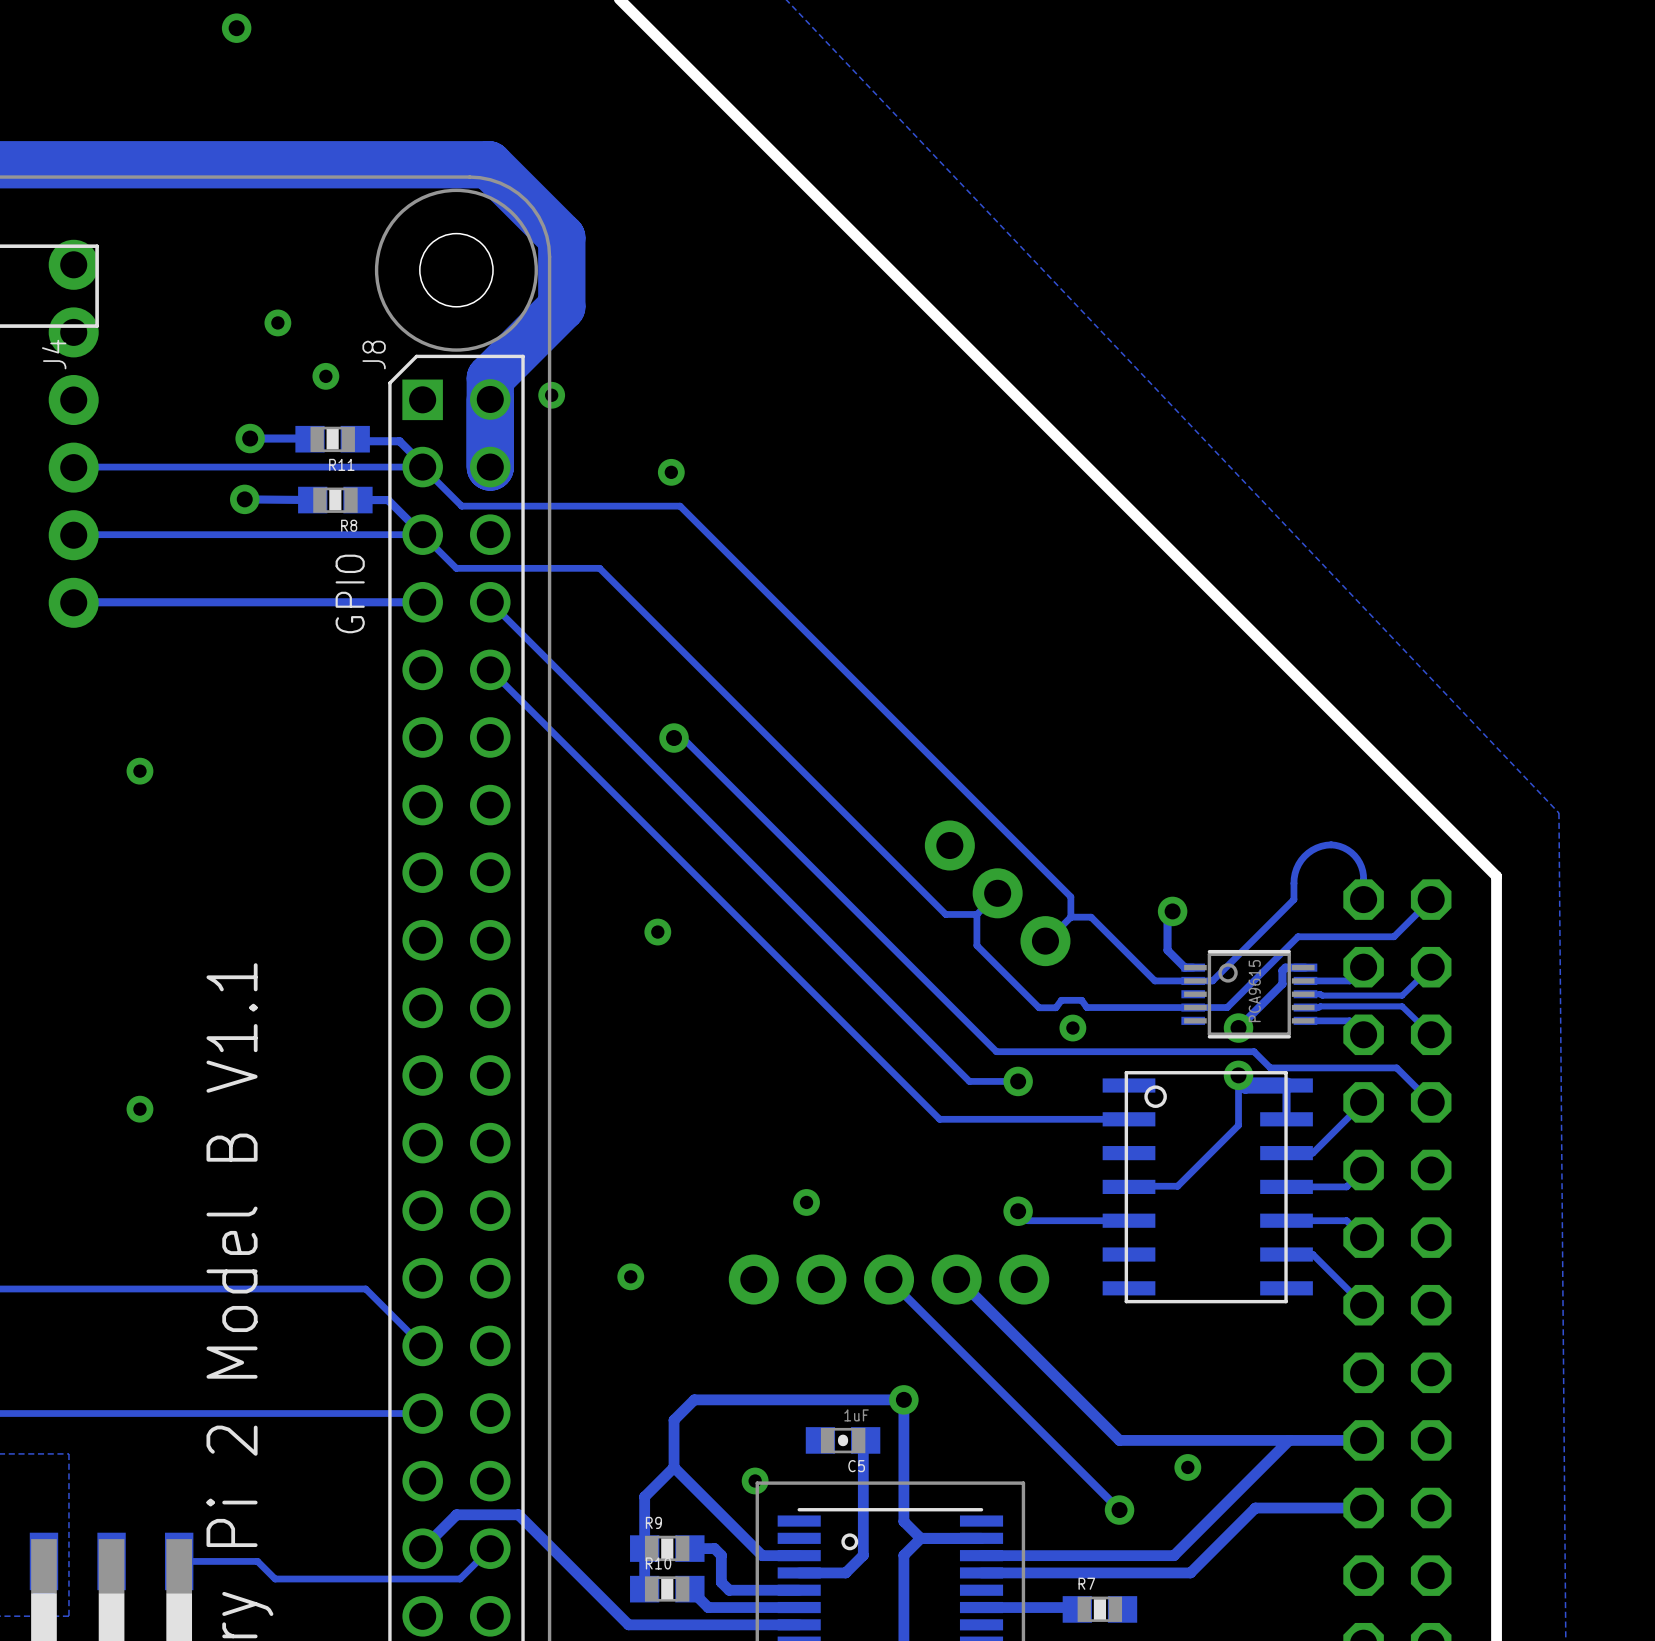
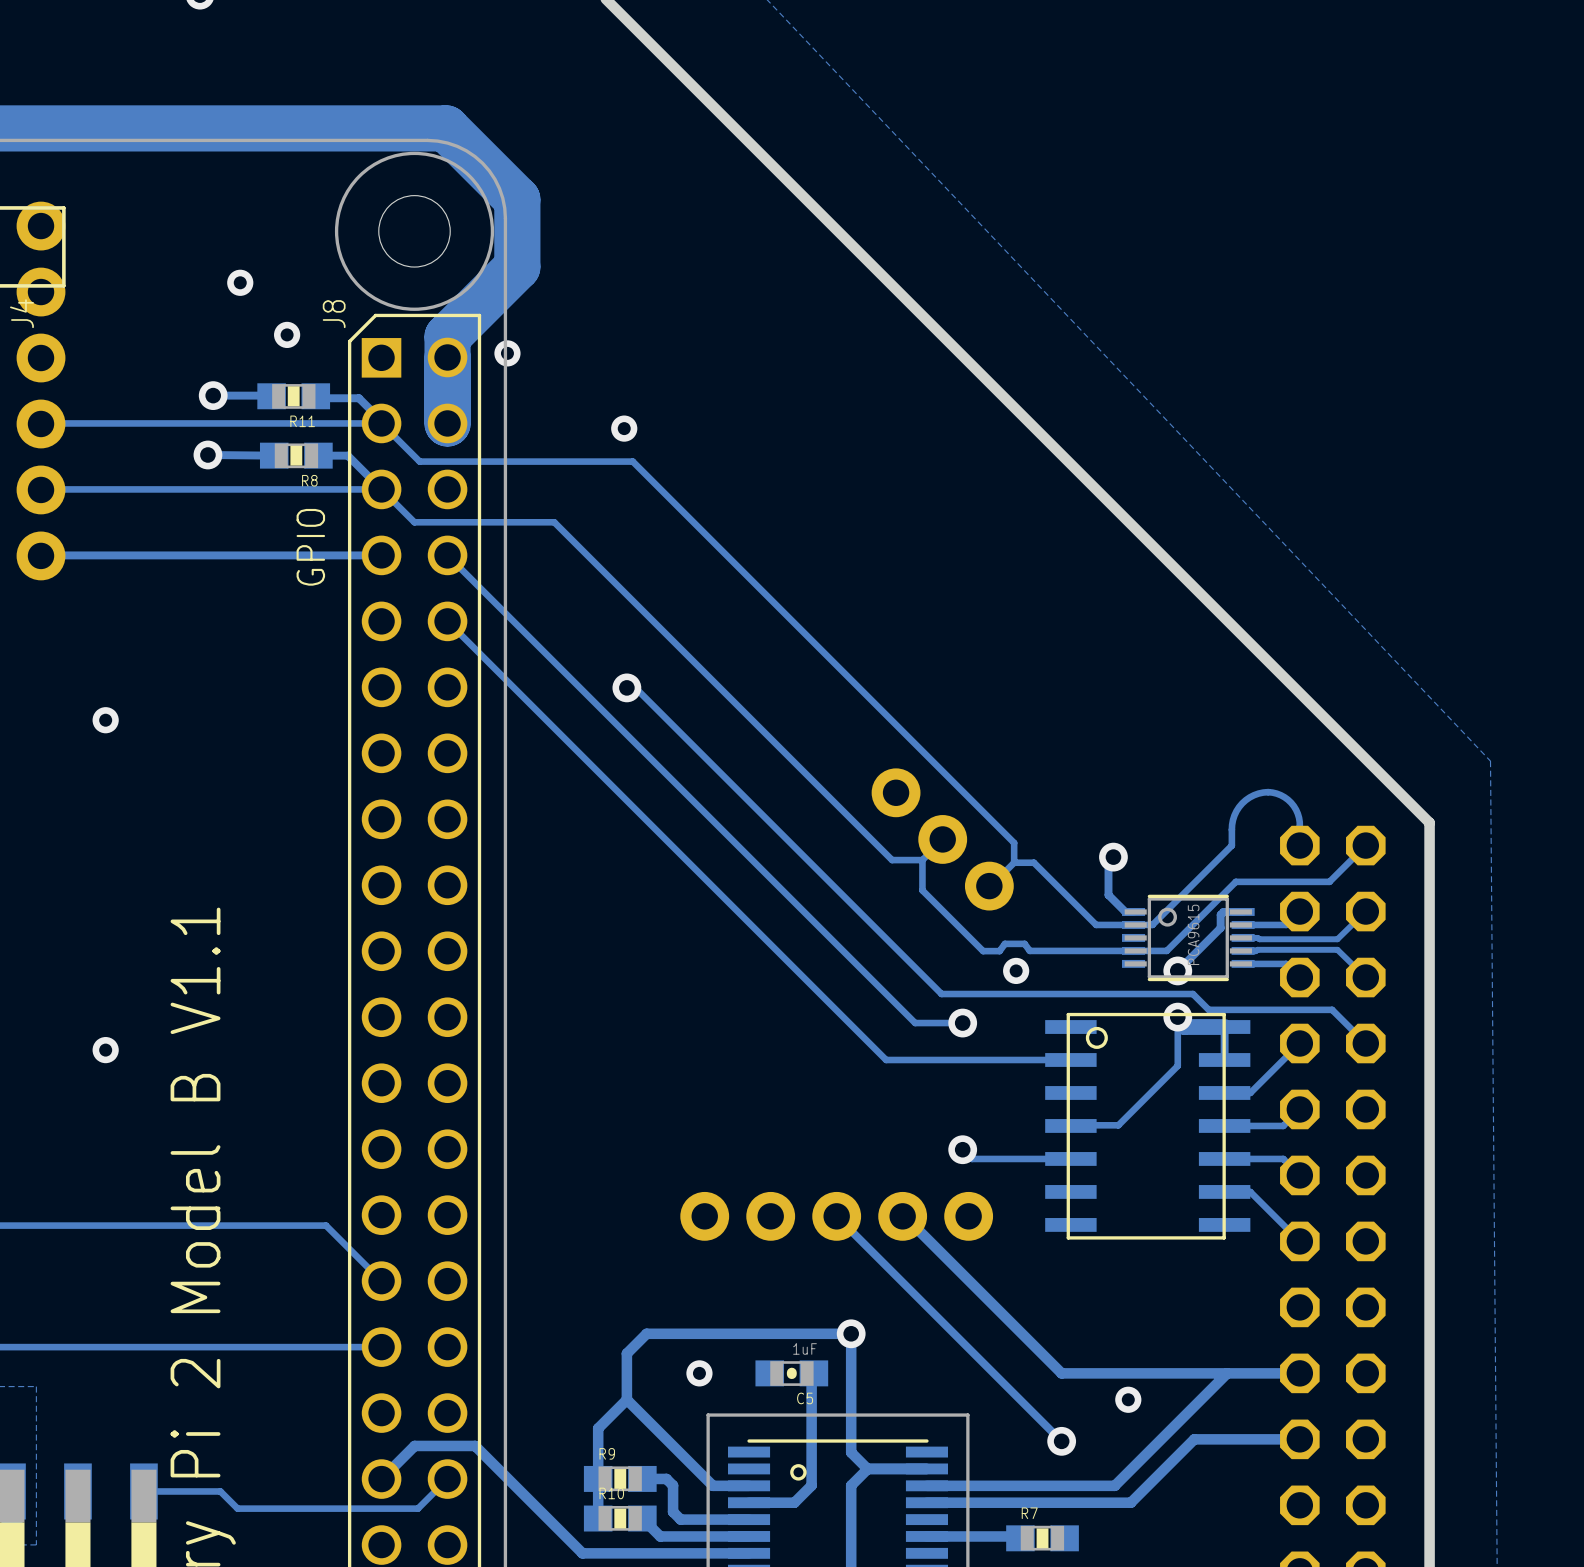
via: (657, 932) -> none
via: (806, 1202) -> none
via: (630, 1276) -> none
via position: (755, 1480) -> (699, 1373)

